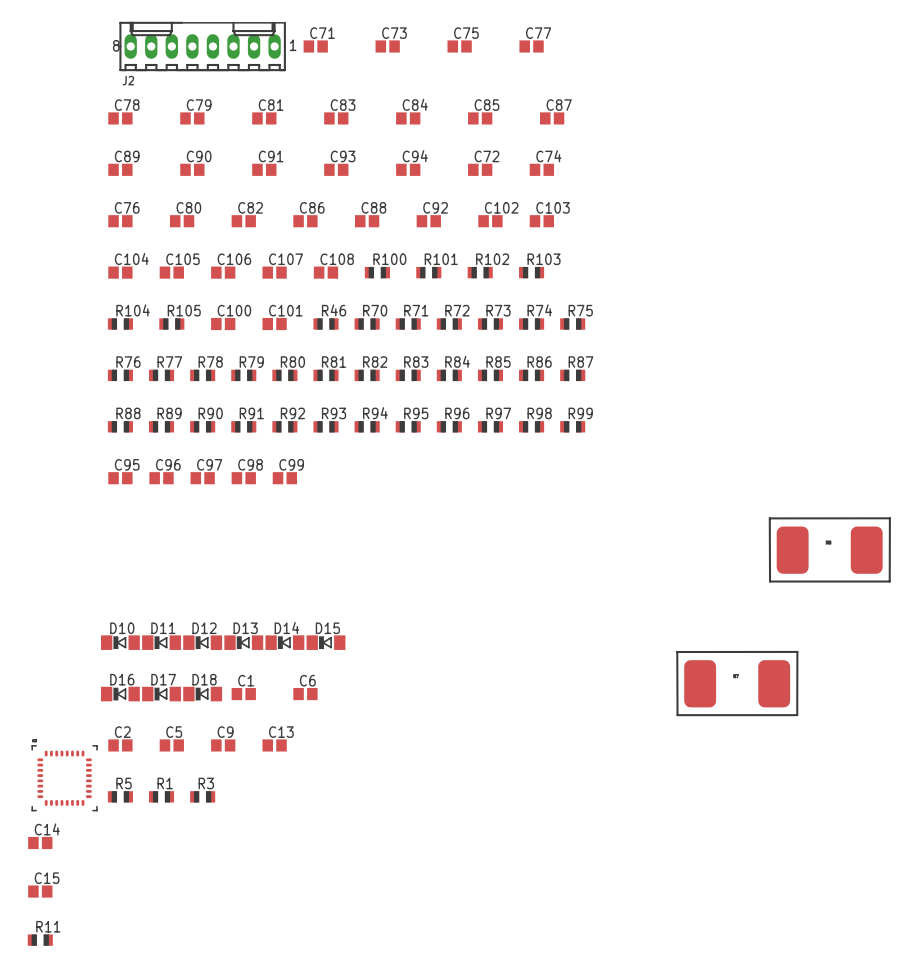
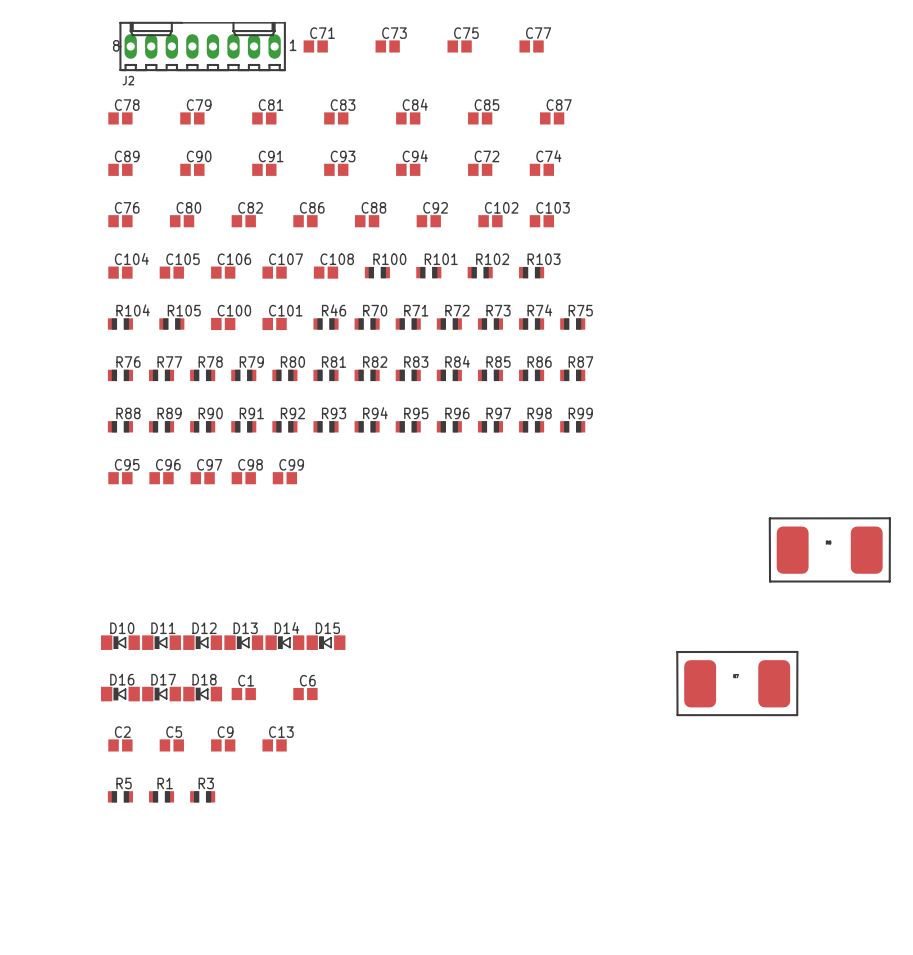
part: (59, 778) -> none
C14: (40, 842) -> none
C15: (40, 891) -> none
R11: (40, 940) -> none

